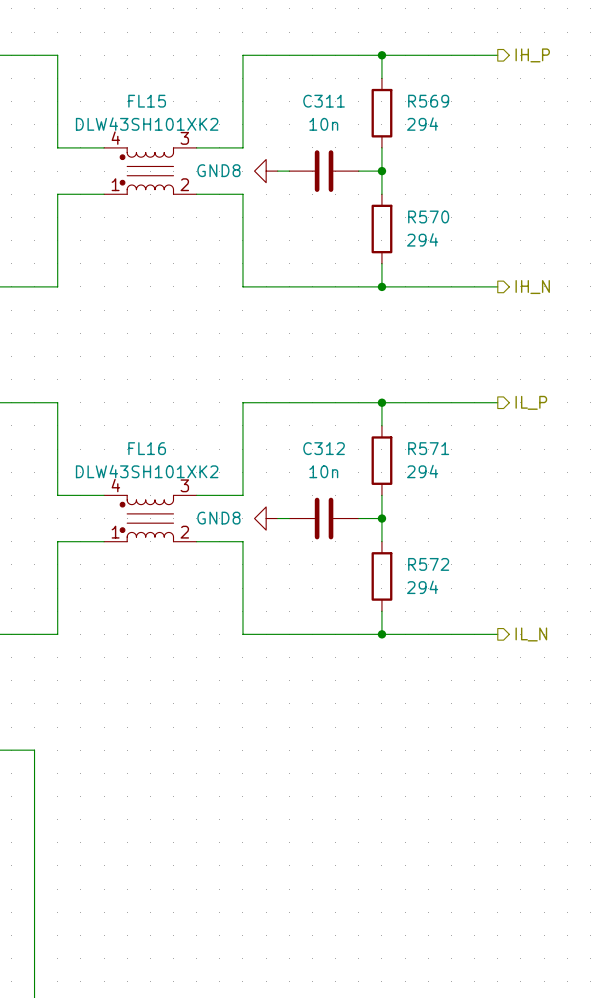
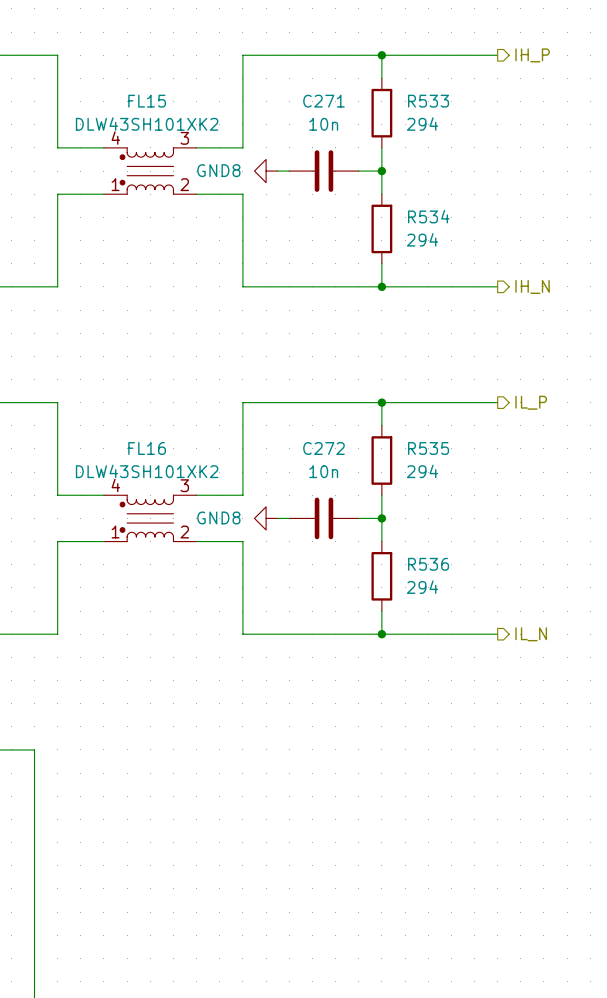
C311 name: C311 (324, 101) -> C271 (323, 101)
R569 name: R569 (428, 101) -> R533 (428, 101)
R570 name: R570 (428, 216) -> R534 (428, 216)
C312 name: C312 (324, 448) -> C272 (323, 448)
R571 name: R571 (428, 448) -> R535 (428, 448)
R572 name: R572 (428, 564) -> R536 (428, 564)

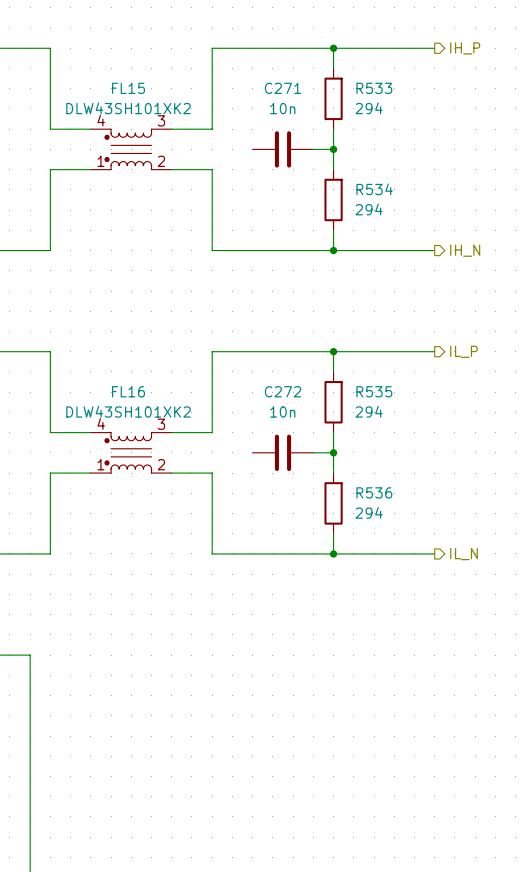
power symbol: GND8 (266, 171) -> none
wire: (277, 171) (289, 171) -> none
power symbol: GND8 (266, 518) -> none
wire: (277, 518) (289, 518) -> none

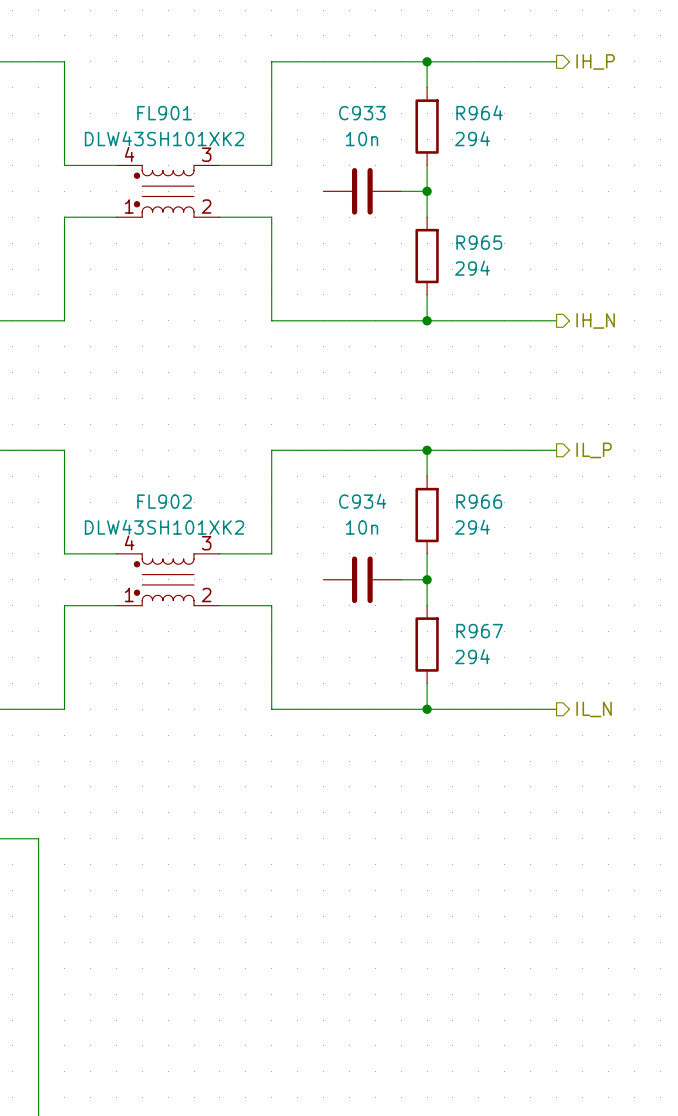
FL15 name: FL15 (128, 88) -> FL901 (164, 113)
C271 name: C271 (283, 88) -> C933 (362, 113)
R533 name: R533 (374, 88) -> R964 (479, 112)
R534 name: R534 (374, 189) -> R965 (479, 242)
FL16 name: FL16 (128, 391) -> FL902 (164, 501)
C272 name: C272 (283, 391) -> C934 (362, 501)
R535 name: R535 (374, 391) -> R966 (479, 501)
R536 name: R536 (374, 492) -> R967 (479, 631)

